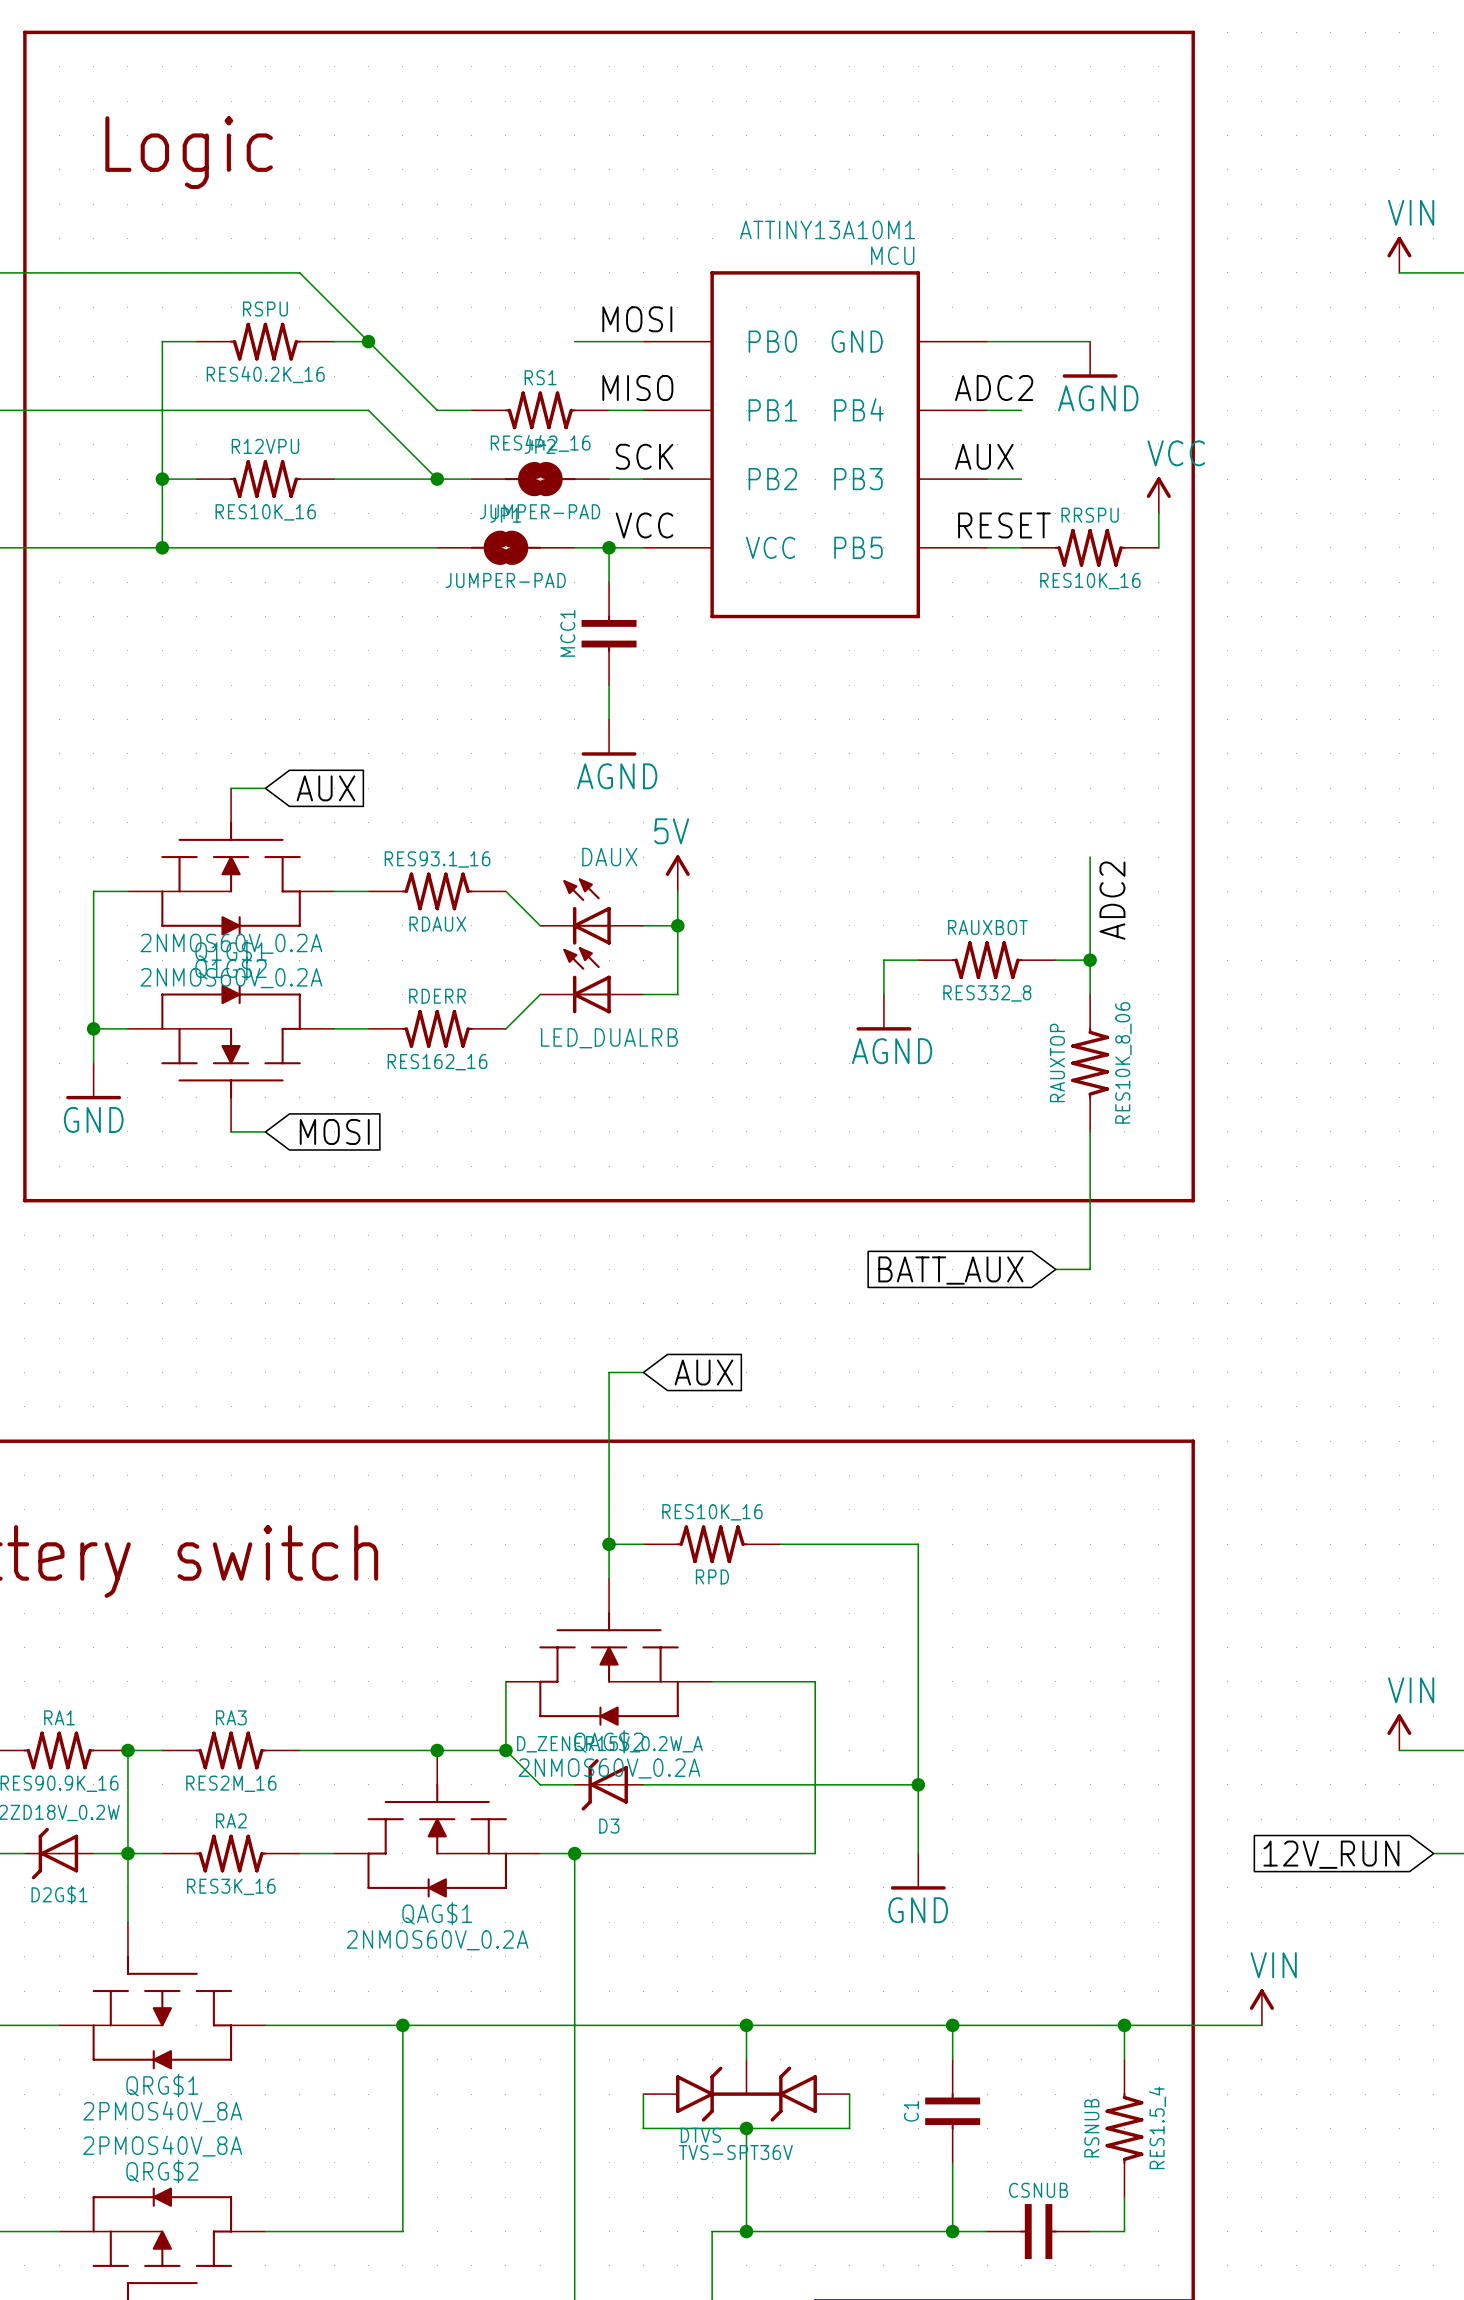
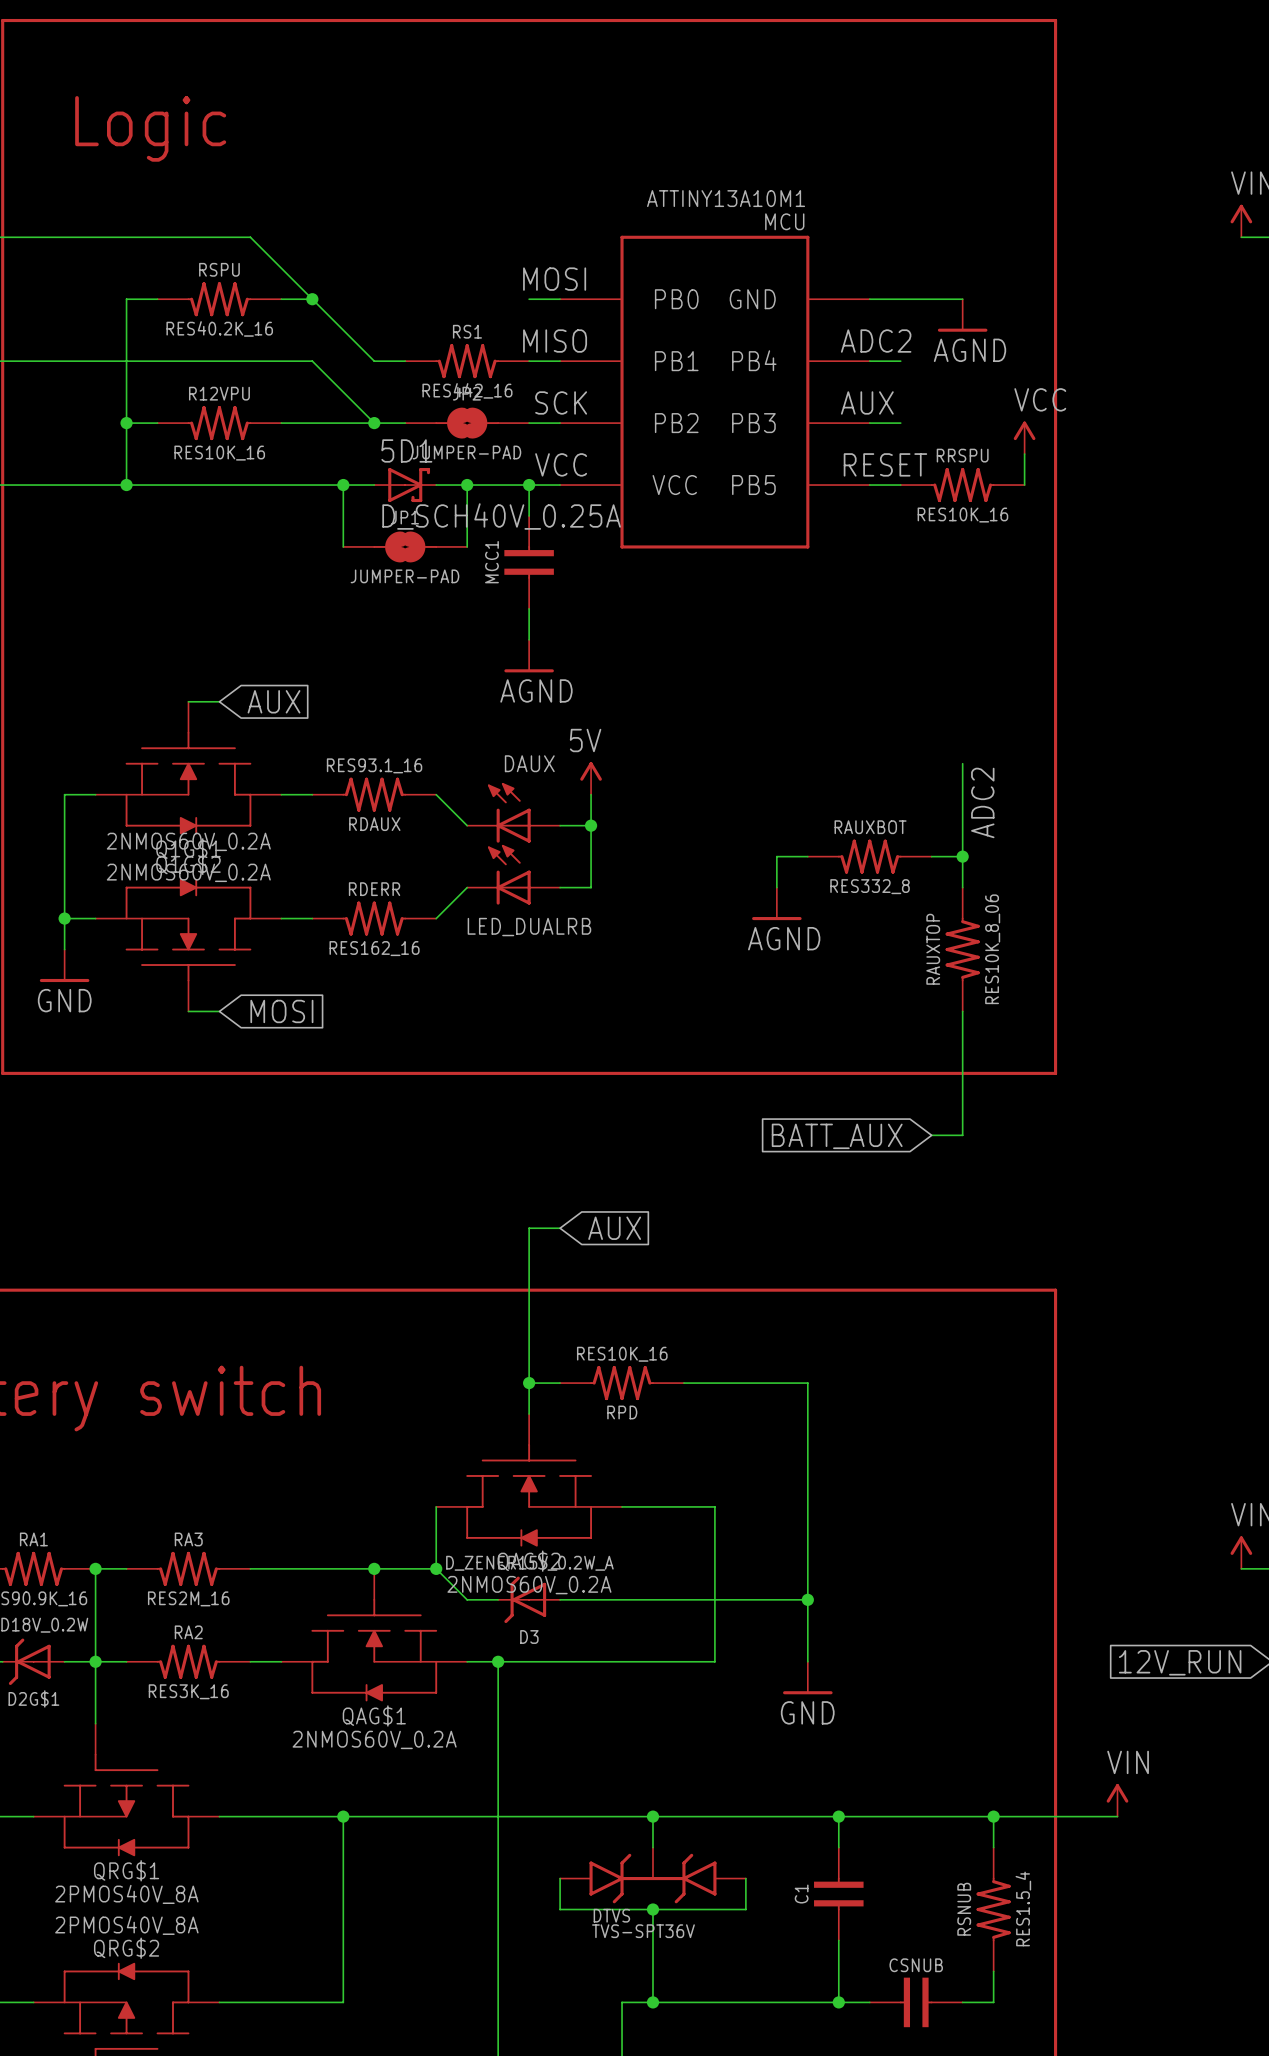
wire: (574, 341) (609, 341) -> none
wire: none -> (343, 485) (343, 546)
junction: none -> (343, 485)
5D1: none -> D_SCH40V_0.25A (405, 485)
JP1 position: (505, 547) -> (405, 546)
wire: none -> (467, 485) (467, 546)
junction: none -> (467, 485)

